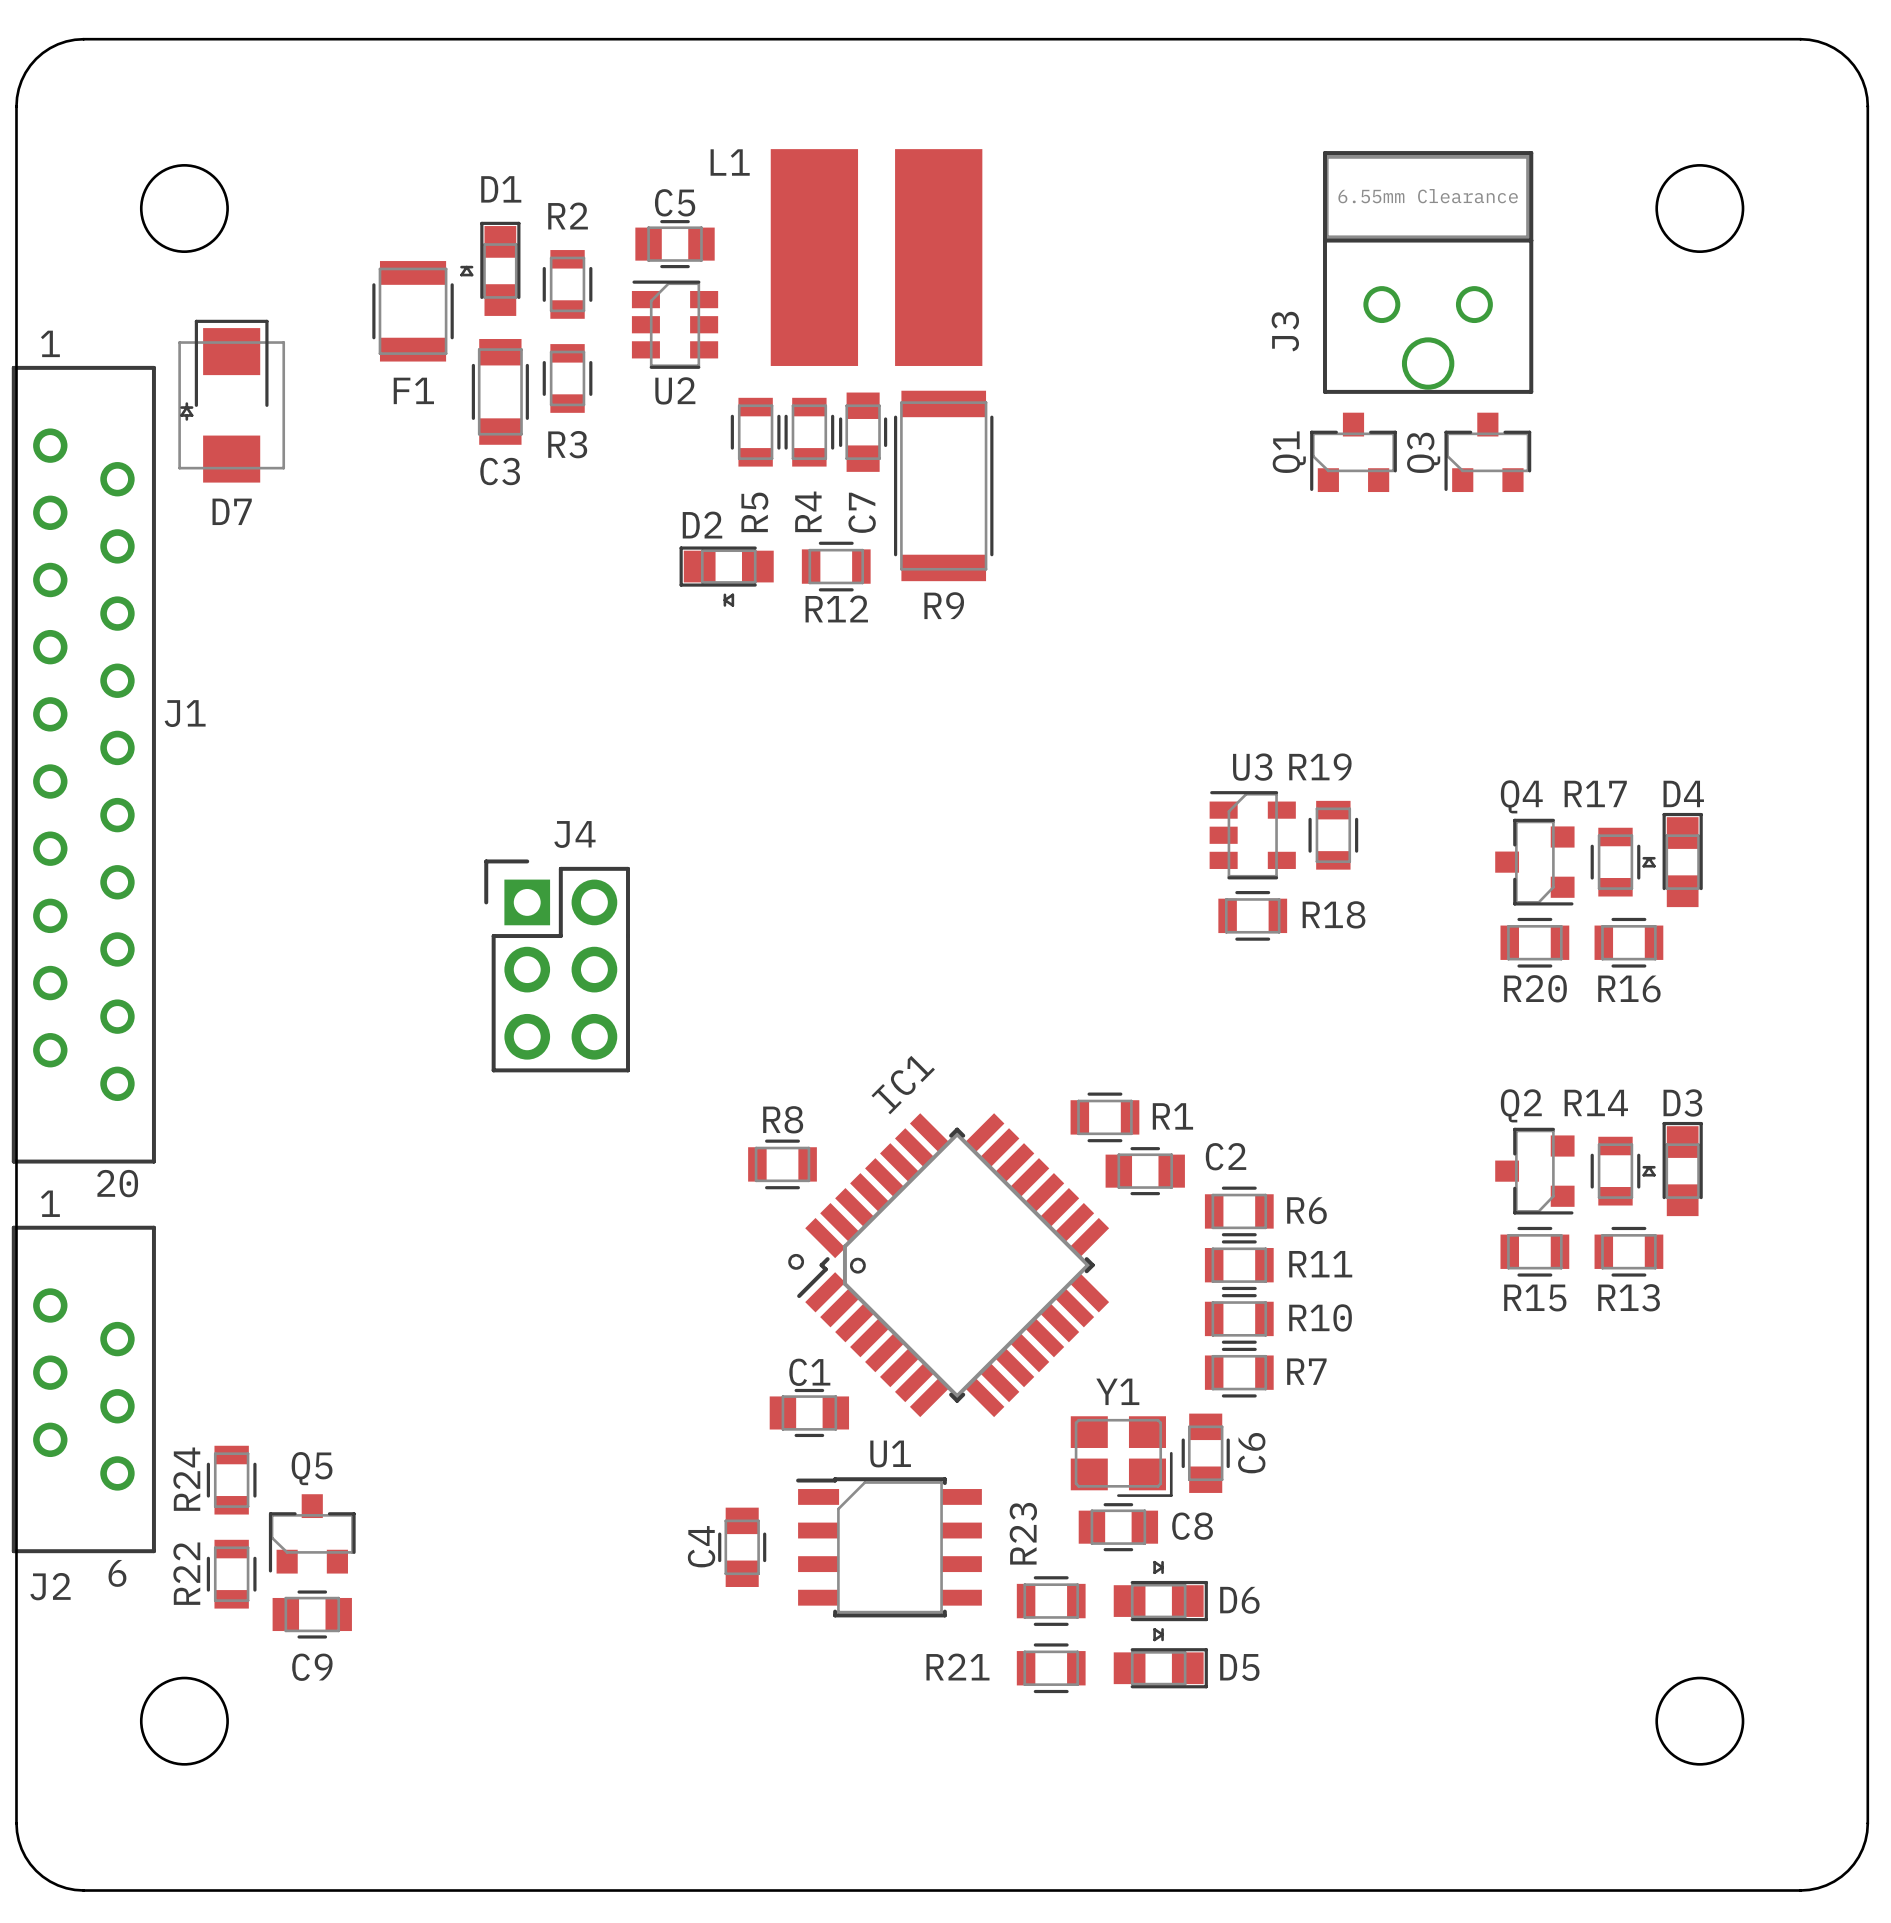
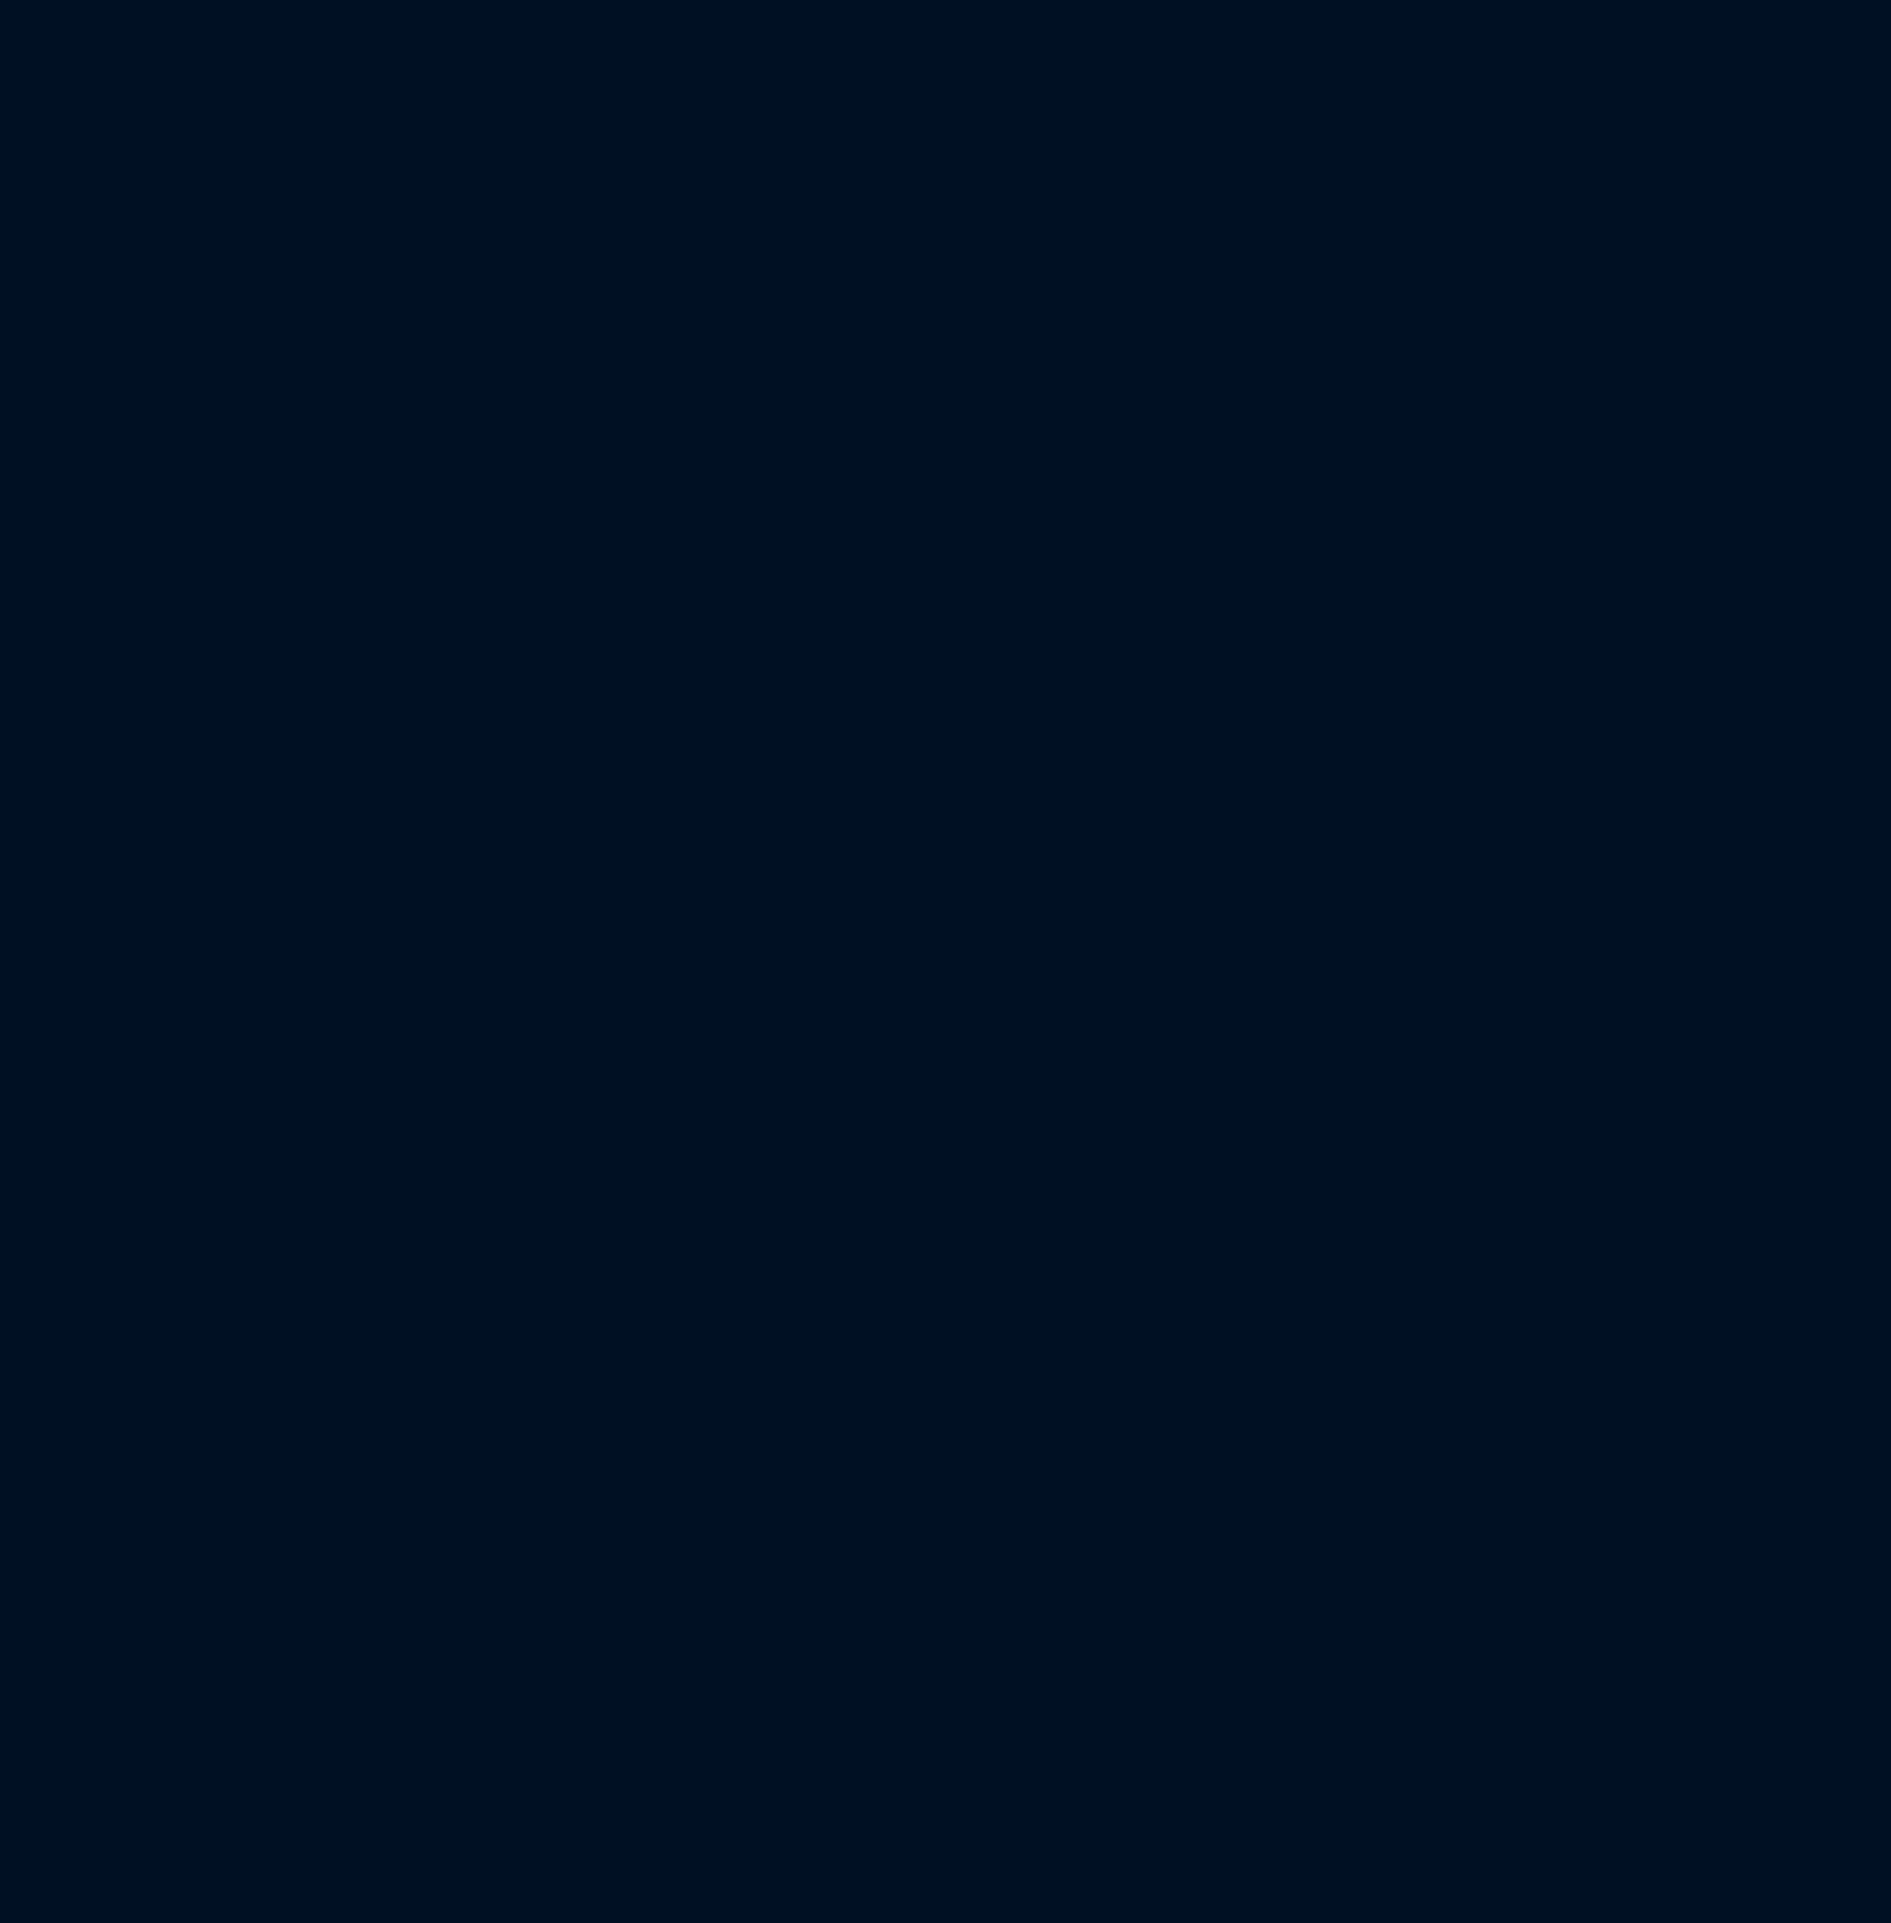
board edge: (83, 39) (1800, 39) (1826, 44) (1848, 58) (1862, 80) (1867, 106) (1867, 1823) (1862, 1849) (1848, 1870) (1826, 1885) (1800, 1890) (83, 1890) (57, 1885) (36, 1870) (21, 1849) (16, 1823) (16, 106) (21, 80) (36, 58) (57, 44) (83, 39) -> none
round board edge: [139, 164, 229, 253] -> none
round board edge: [1655, 164, 1745, 253] -> none
C5: (675, 244) -> none
L1: (876, 257) -> none
D1: (490, 268) -> none
J3: (1428, 272) -> none
R2: (567, 284) -> none
F1: (413, 311) -> none
U2: (675, 324) -> none
R3: (567, 378) -> none
C3: (500, 391) -> none
D7: (231, 401) -> none
R4: (755, 432) -> none
R5: (809, 432) -> none
C7: (863, 432) -> none
Q1: (1353, 452) -> none
Q3: (1487, 452) -> none
R9: (943, 485) -> none
R12: (836, 566) -> none
D2: (726, 576) -> none
J1: (83, 764) -> none
U3: (1252, 835) -> none
R19: (1333, 835) -> none
D4: (1672, 860) -> none
Q4: (1534, 862) -> none
R17: (1615, 862) -> none
R18: (1252, 915) -> none
R20: (1534, 942) -> none
R16: (1628, 942) -> none
J4: (557, 965) -> none
R1: (1104, 1117) -> none
R8: (782, 1164) -> none
D3: (1672, 1169) -> none
C2: (1145, 1171) -> none
Q2: (1534, 1171) -> none
R14: (1615, 1171) -> none
R6: (1239, 1211) -> none
R15: (1534, 1251) -> none
R13: (1628, 1251) -> none
IC1: (948, 1265) -> none
R11: (1239, 1265) -> none
R10: (1239, 1318) -> none
R7: (1239, 1372) -> none
J2: (83, 1389) -> none
C1: (809, 1412) -> none
C6: (1205, 1453) -> none
Y1: (1121, 1456) -> none
R24: (231, 1480) -> none
C8: (1118, 1527) -> none
Q5: (312, 1533) -> none
C4: (742, 1547) -> none
U1: (888, 1547) -> none
R22: (231, 1574) -> none
D6: (1160, 1591) -> none
R23: (1051, 1601) -> none
C9: (312, 1614) -> none
D5: (1160, 1658) -> none
R21: (1051, 1668) -> none
round board edge: [139, 1676, 229, 1766] -> none
round board edge: [1655, 1676, 1745, 1766] -> none

